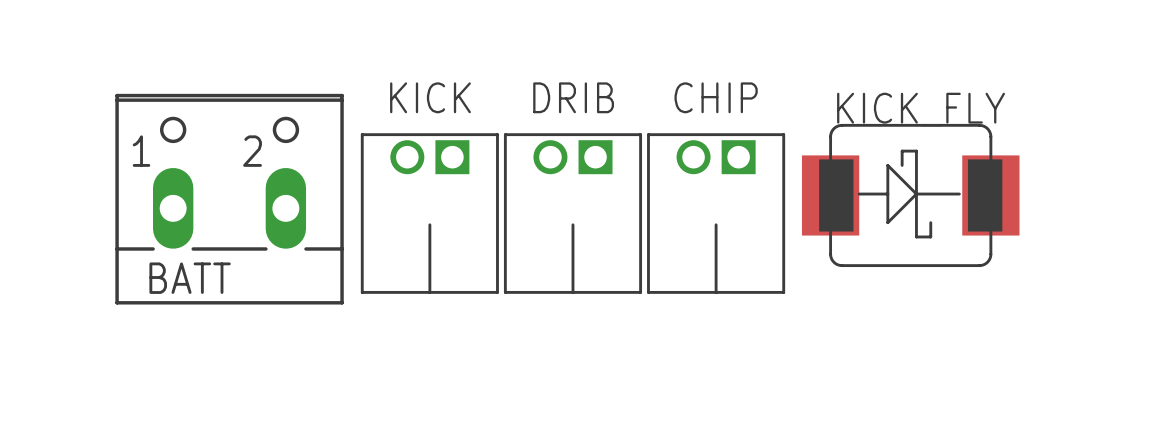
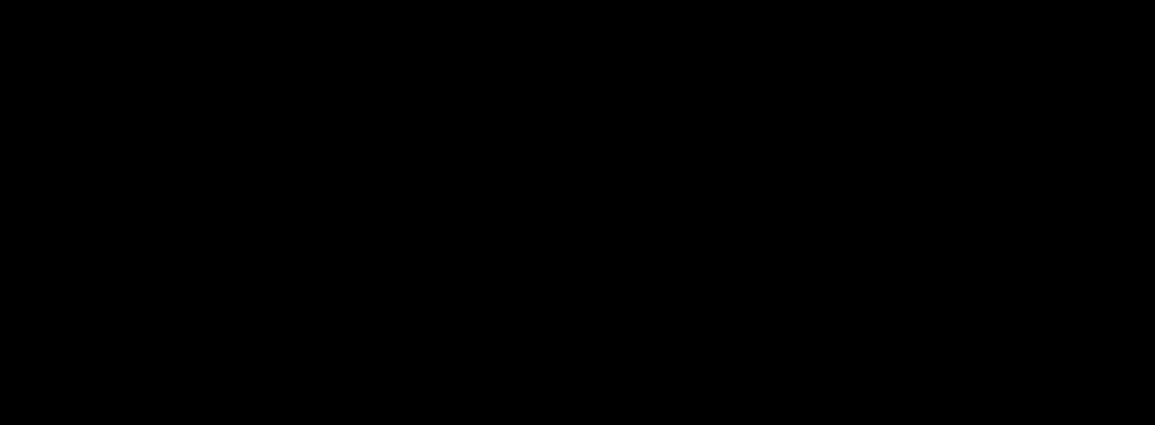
KICK_FLY: (910, 195) -> none
BATT: (229, 199) -> none
KICK: (429, 213) -> none
DRIB: (572, 213) -> none
CHIP: (716, 213) -> none

